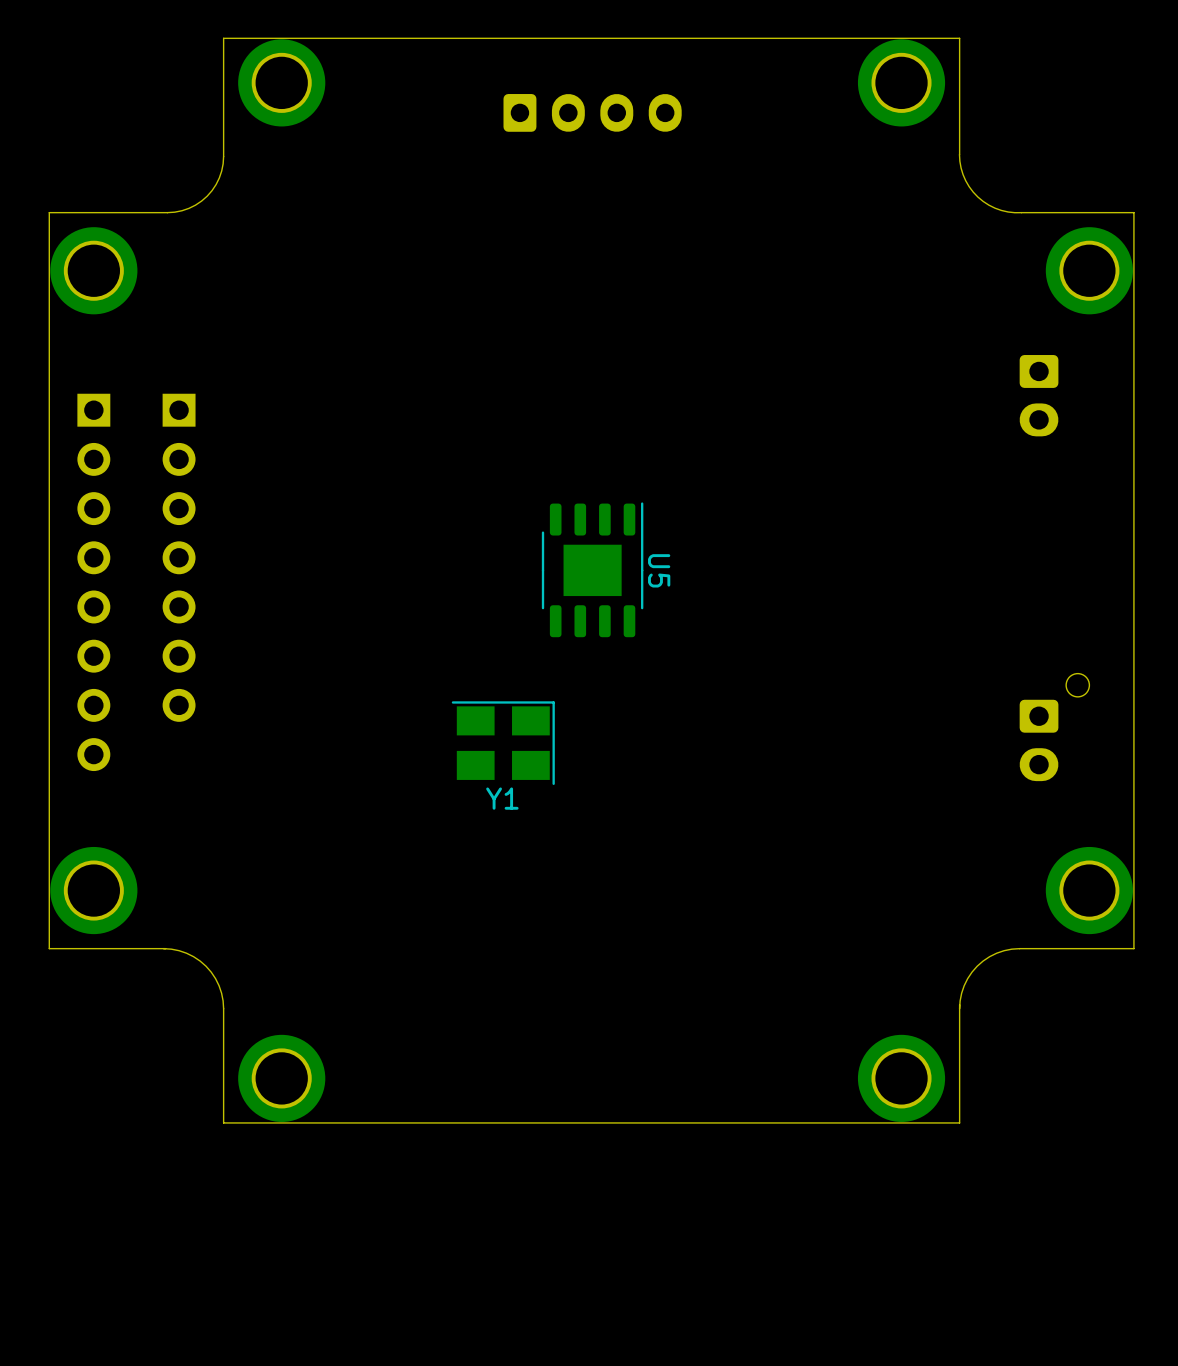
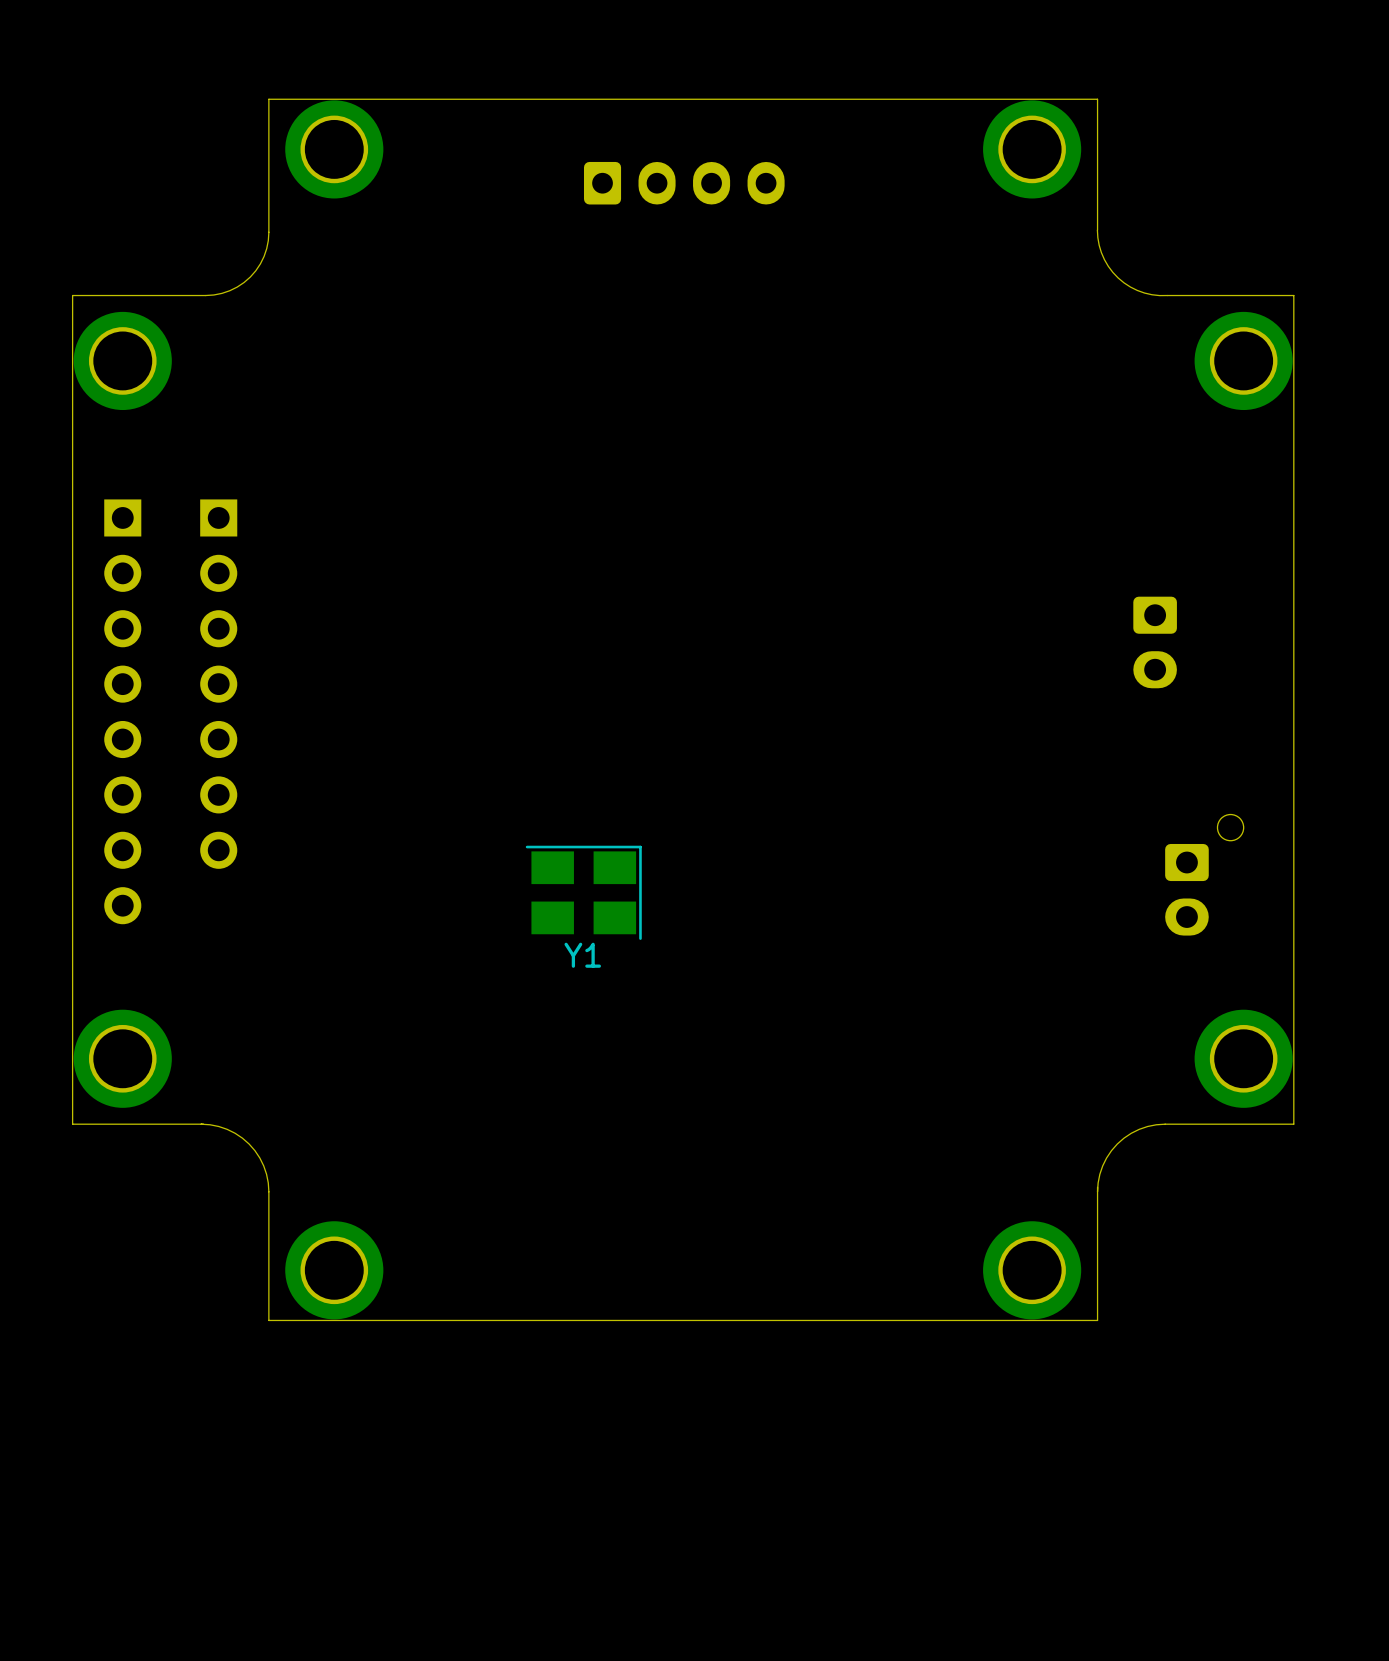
part position: (1039, 395) -> (1155, 642)
U5: (592, 569) -> none

